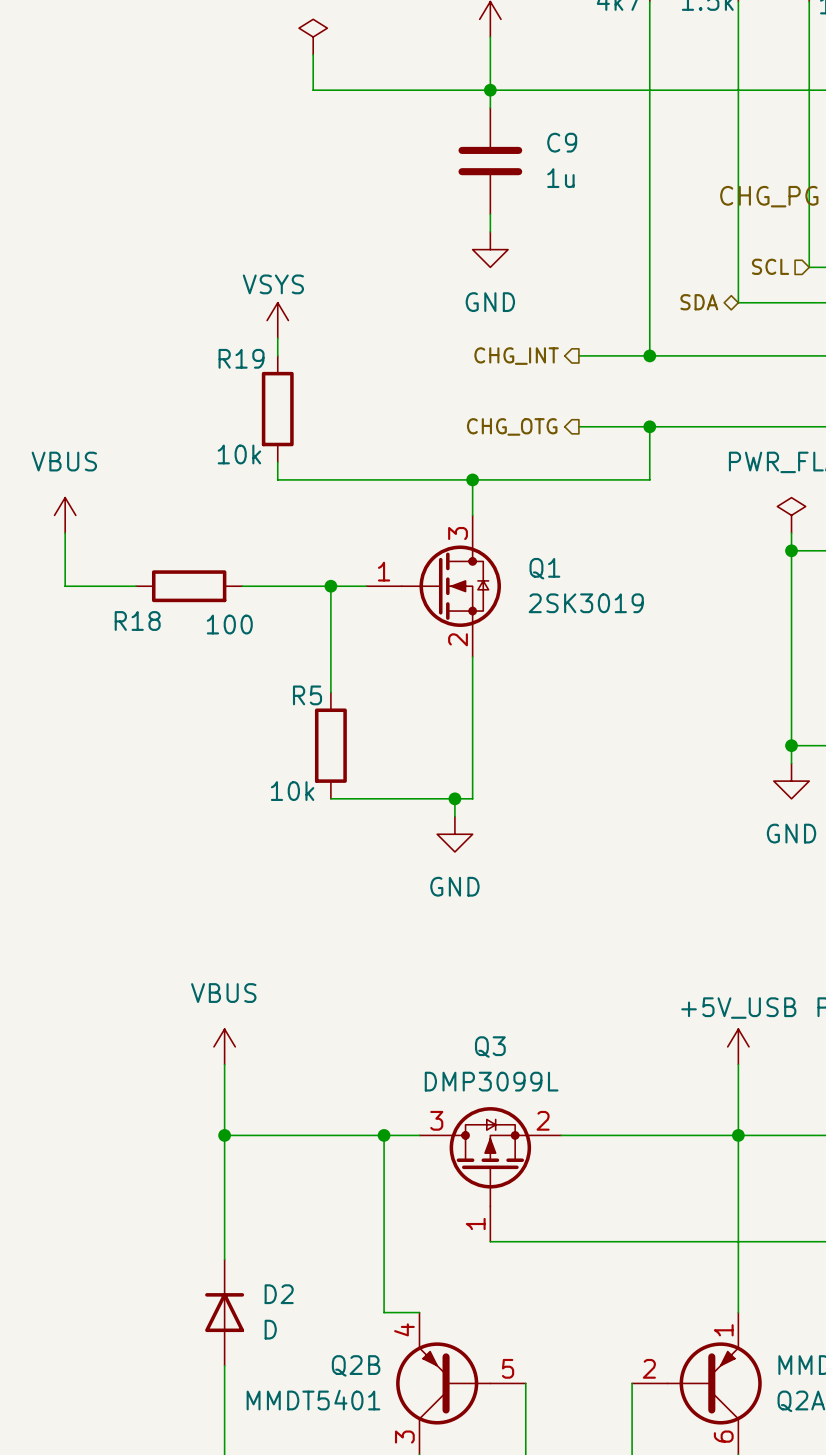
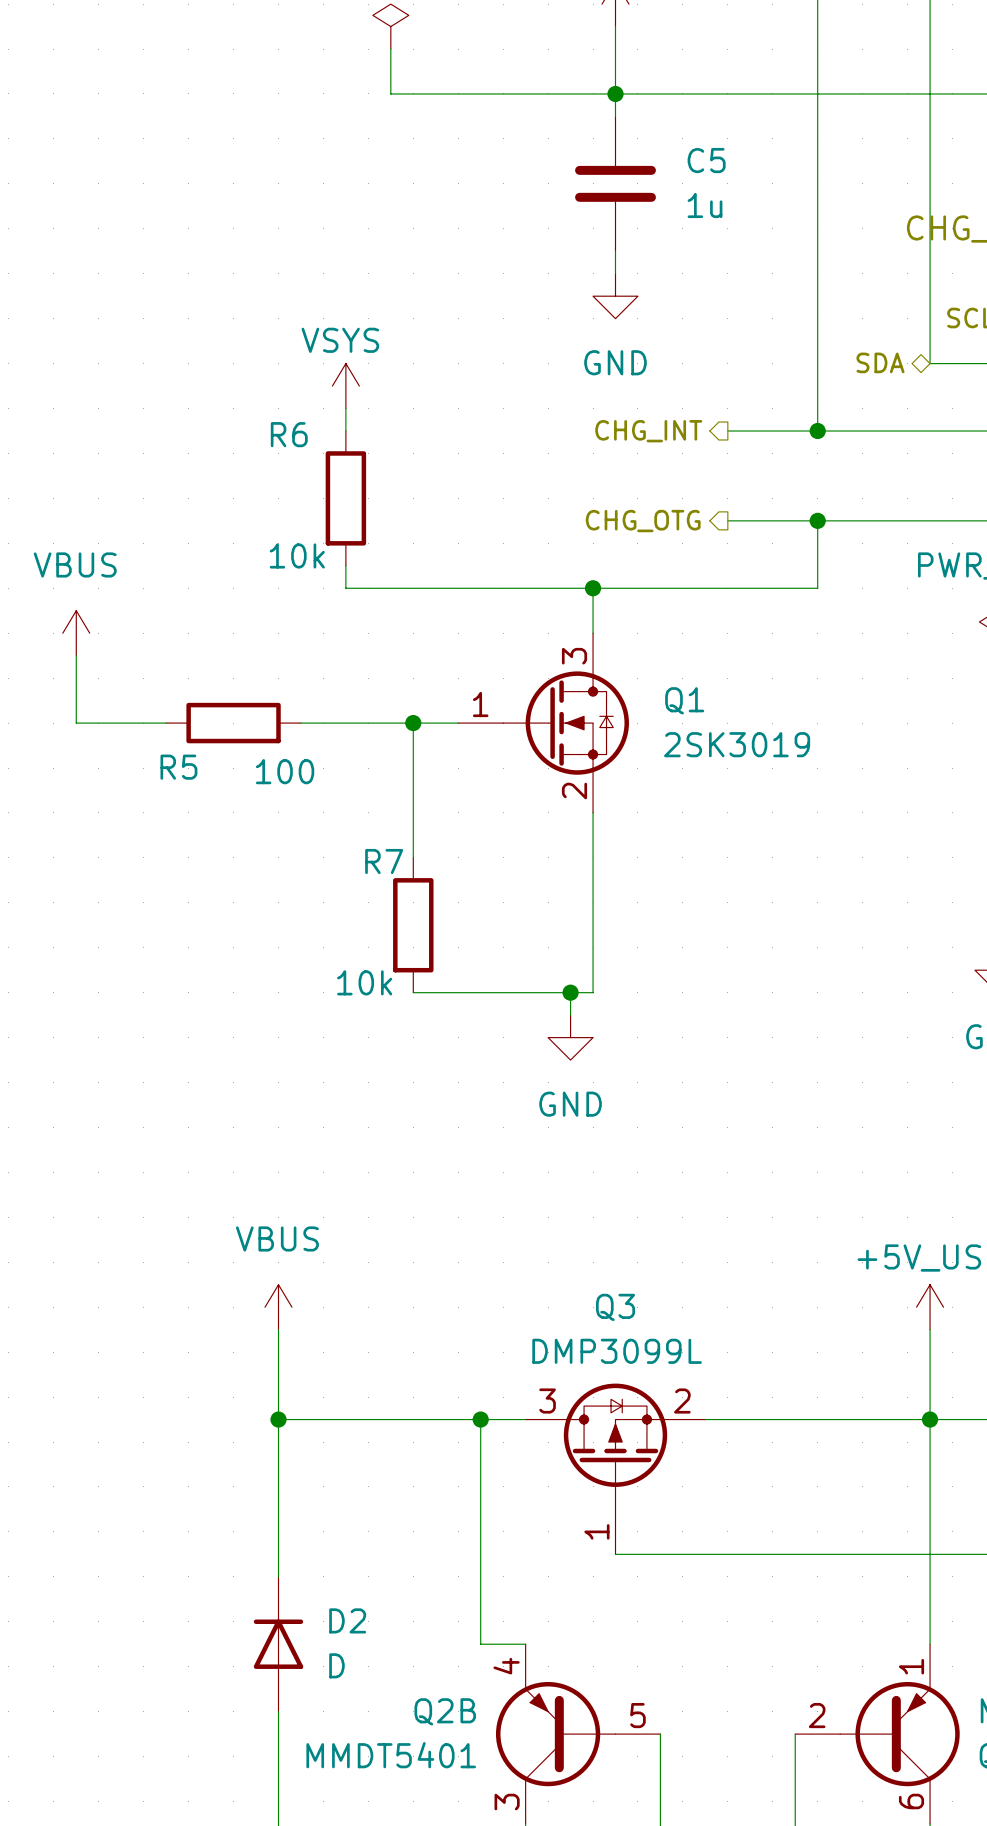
C9 name: C9 (562, 142) -> C5 (706, 160)
R19 name: R19 (241, 358) -> R6 (289, 434)
R18 name: R18 (137, 621) -> R5 (178, 767)
R5 name: R5 (307, 695) -> R7 (384, 861)

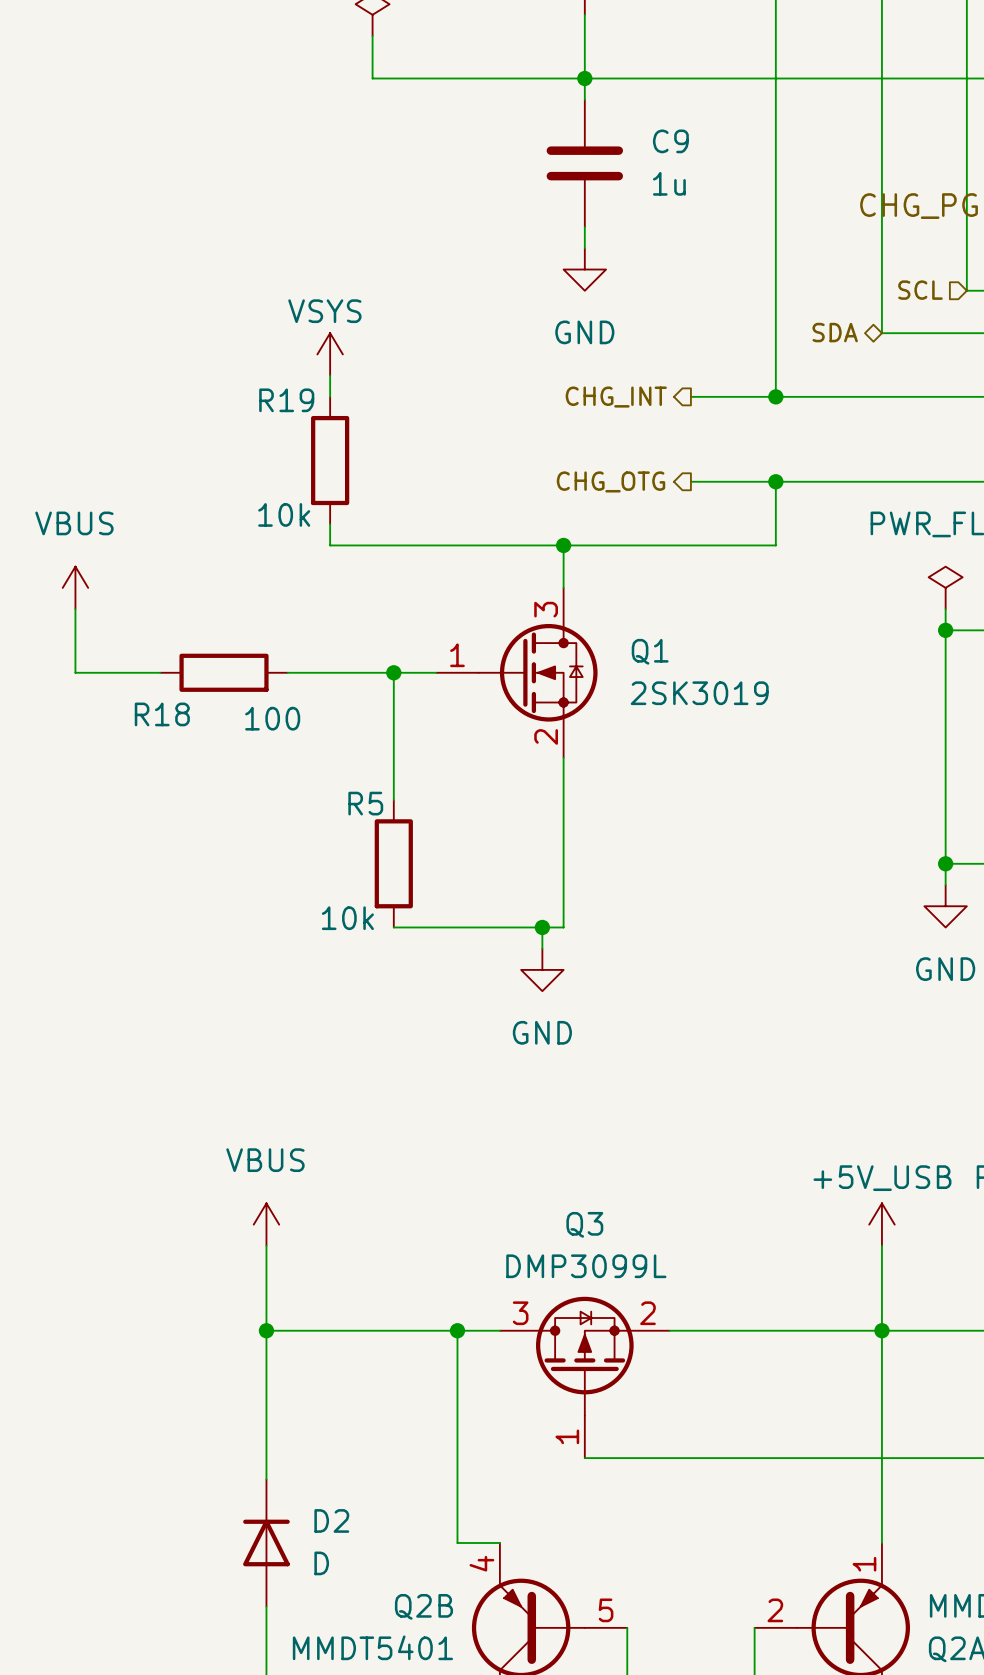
C5 name: C5 (706, 160) -> C9 (670, 141)
R6 name: R6 (289, 434) -> R19 (286, 400)
R5 name: R5 (178, 767) -> R18 (162, 714)
R7 name: R7 (384, 861) -> R5 (365, 803)

